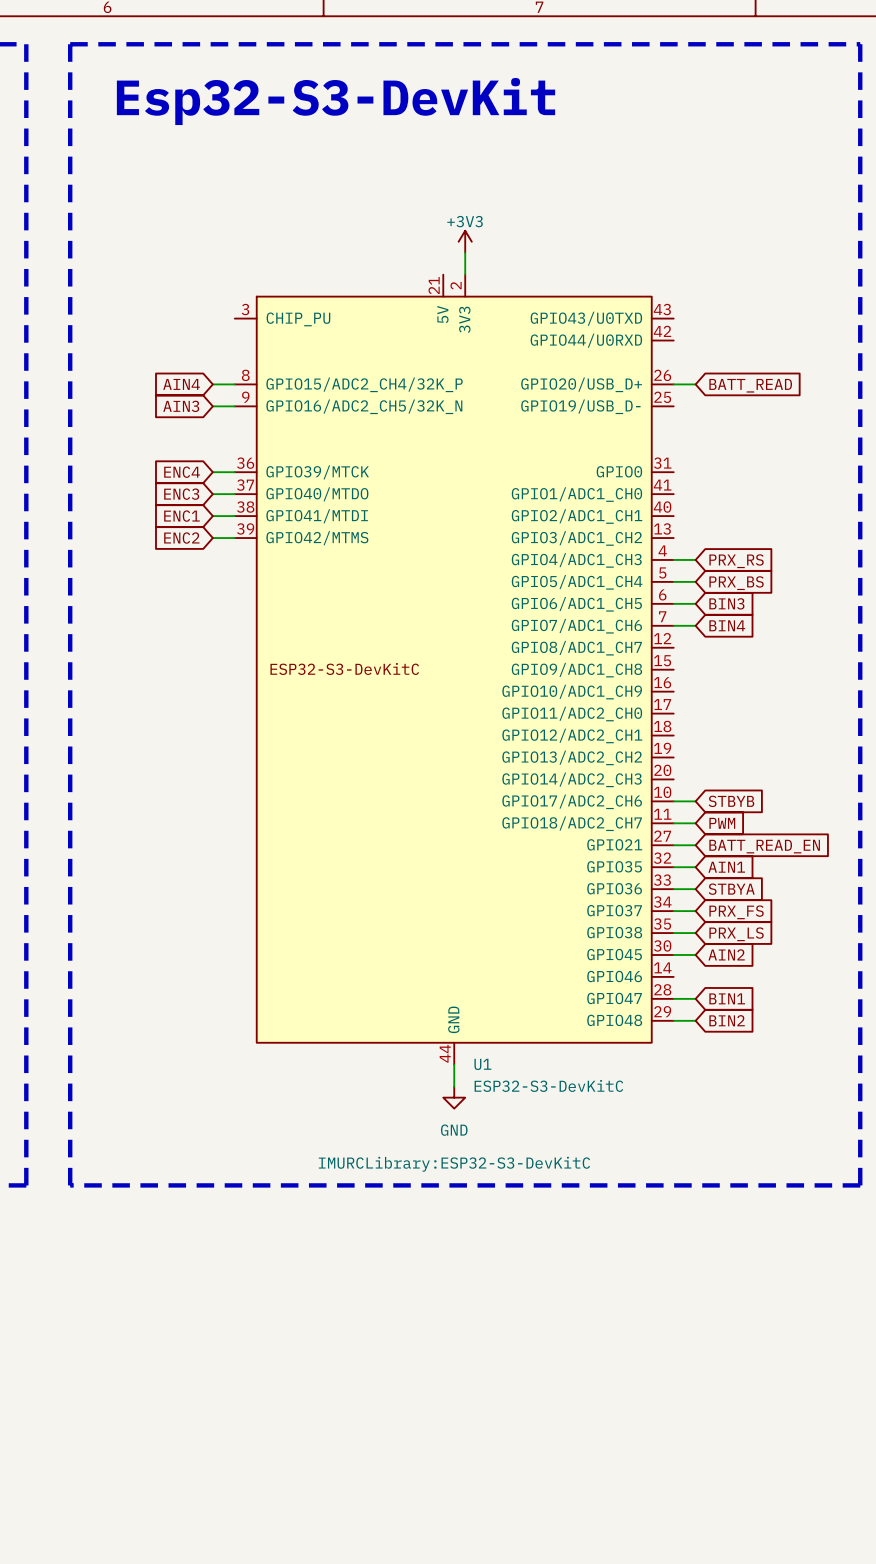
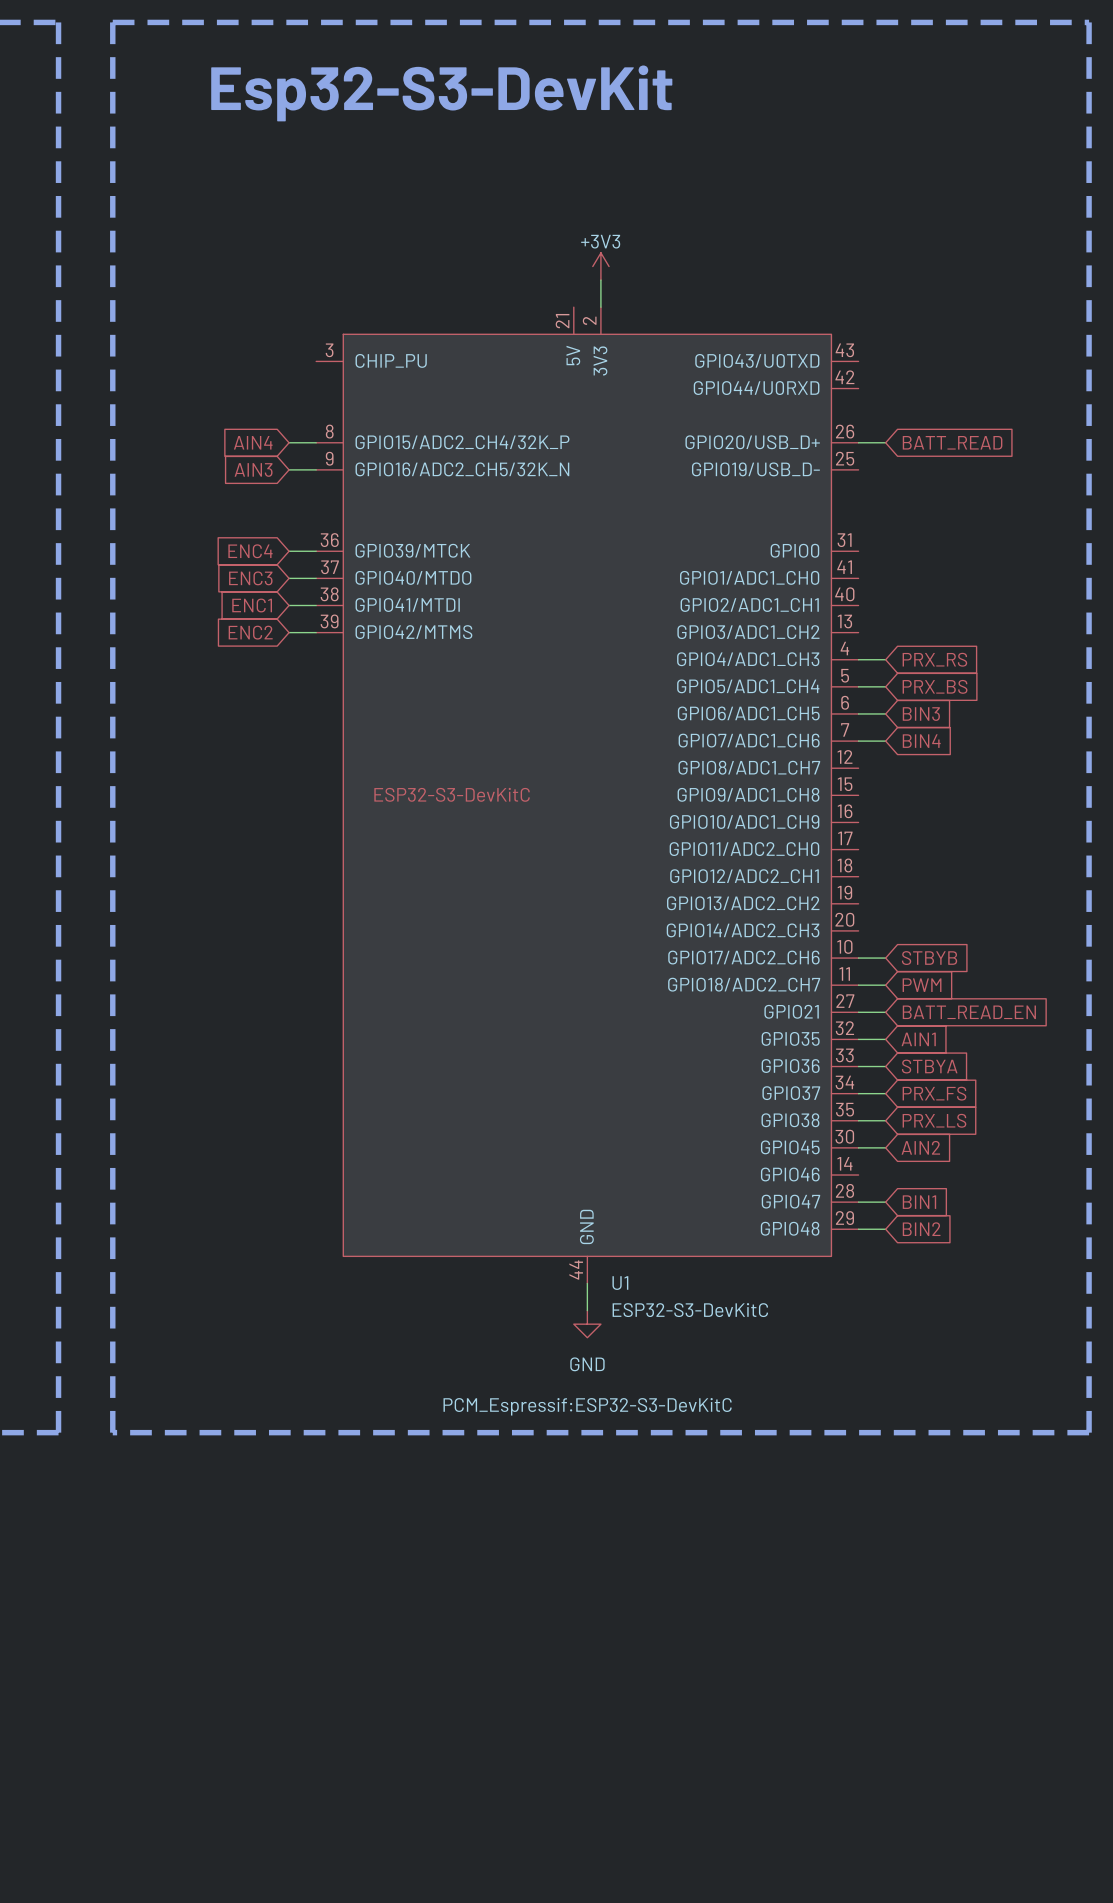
U1 text: IMURCLibrary:ESP32-S3-DevKitC (454, 1164) -> PCM_Espressif:ESP32-S3-DevKitC (587, 1406)

